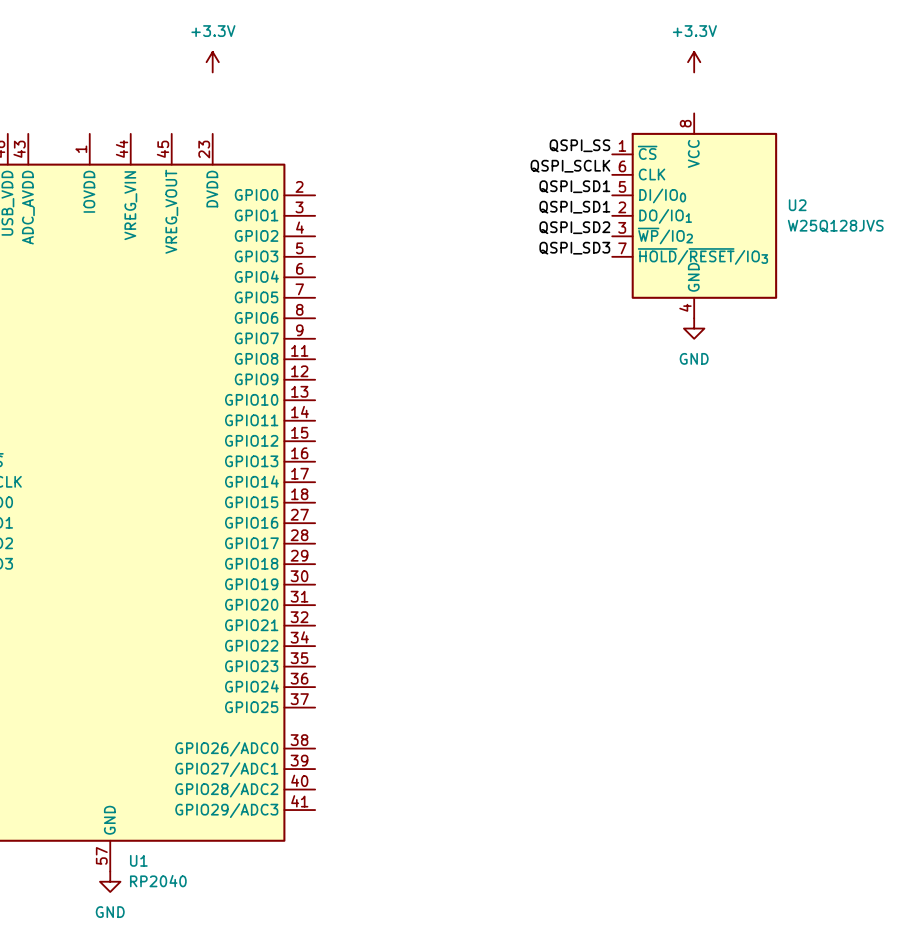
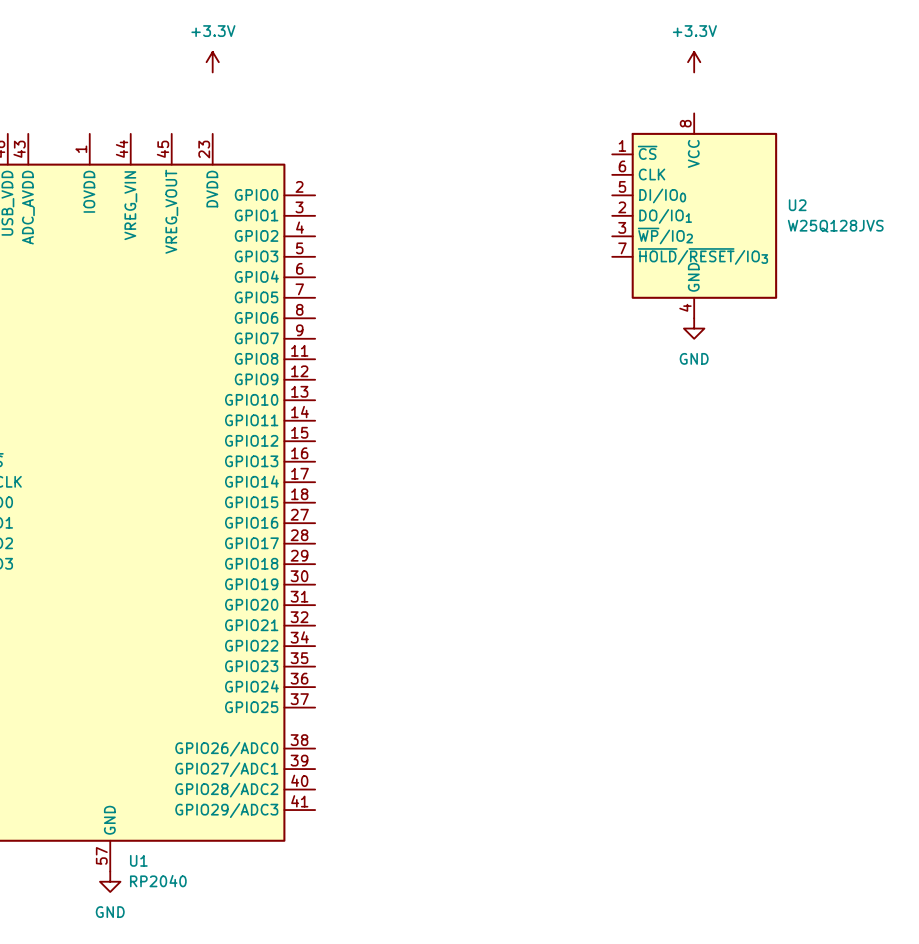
label: QSPI_SS (579, 145) -> none
label: QSPI_SCLK (570, 166) -> none
label: QSPI_SD1 (574, 186) -> none
label: QSPI_SD1 (574, 207) -> none
label: QSPI_SD2 (574, 227) -> none
label: QSPI_SD3 (574, 248) -> none

